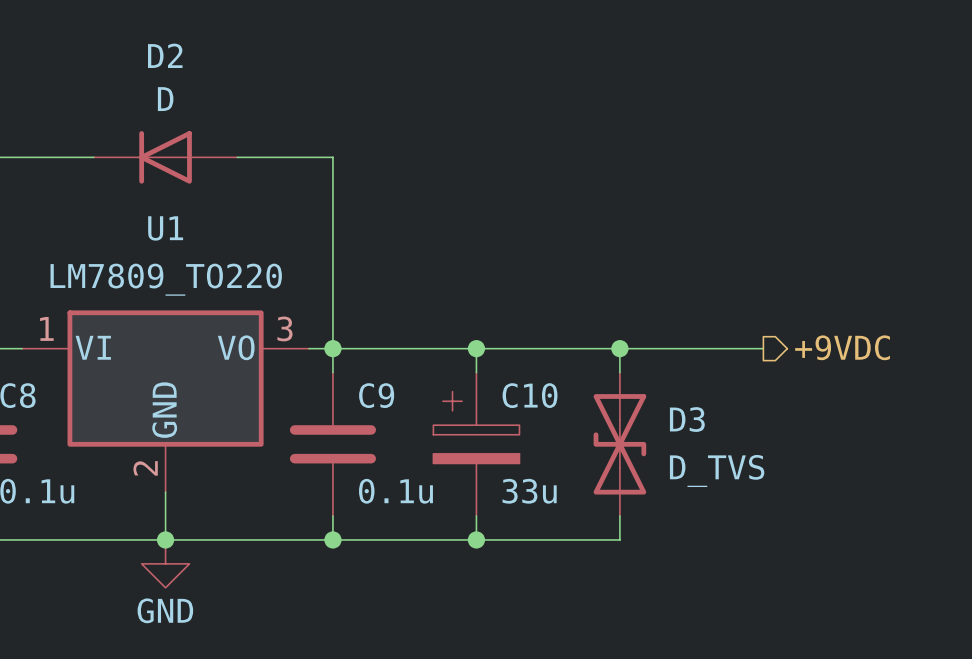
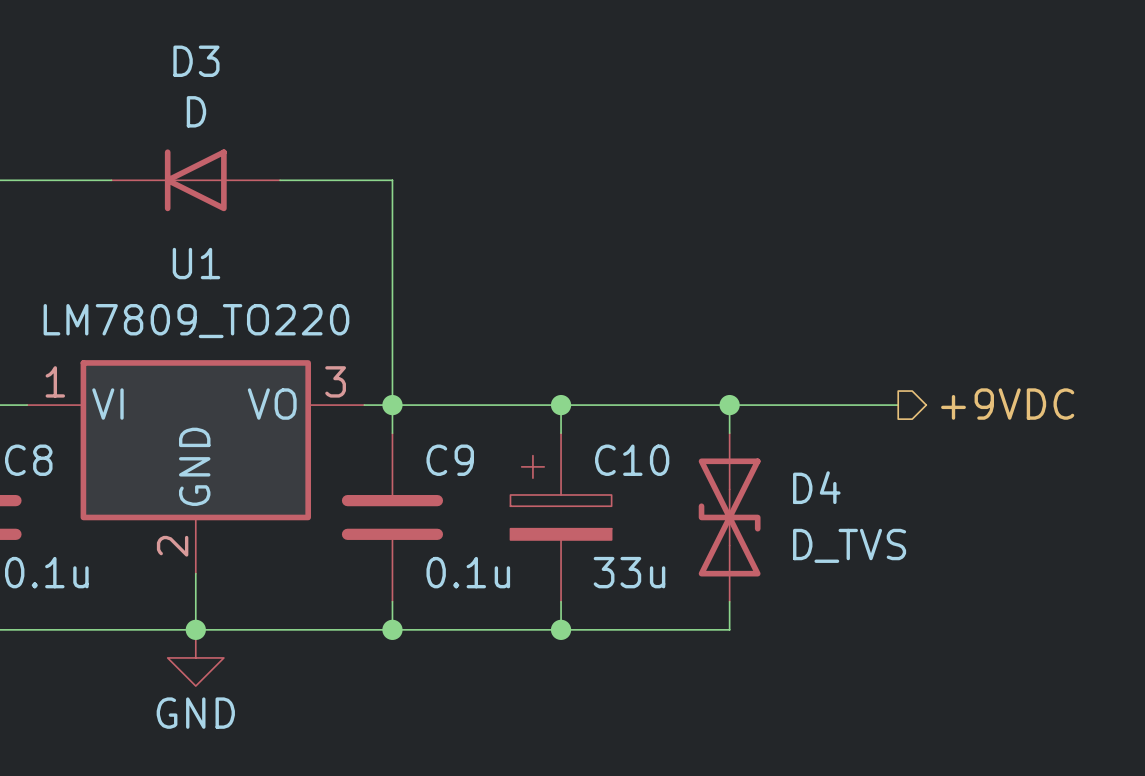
D2 name: D2 (165, 55) -> D3 (196, 61)
D3 name: D3 (687, 419) -> D4 (816, 487)

